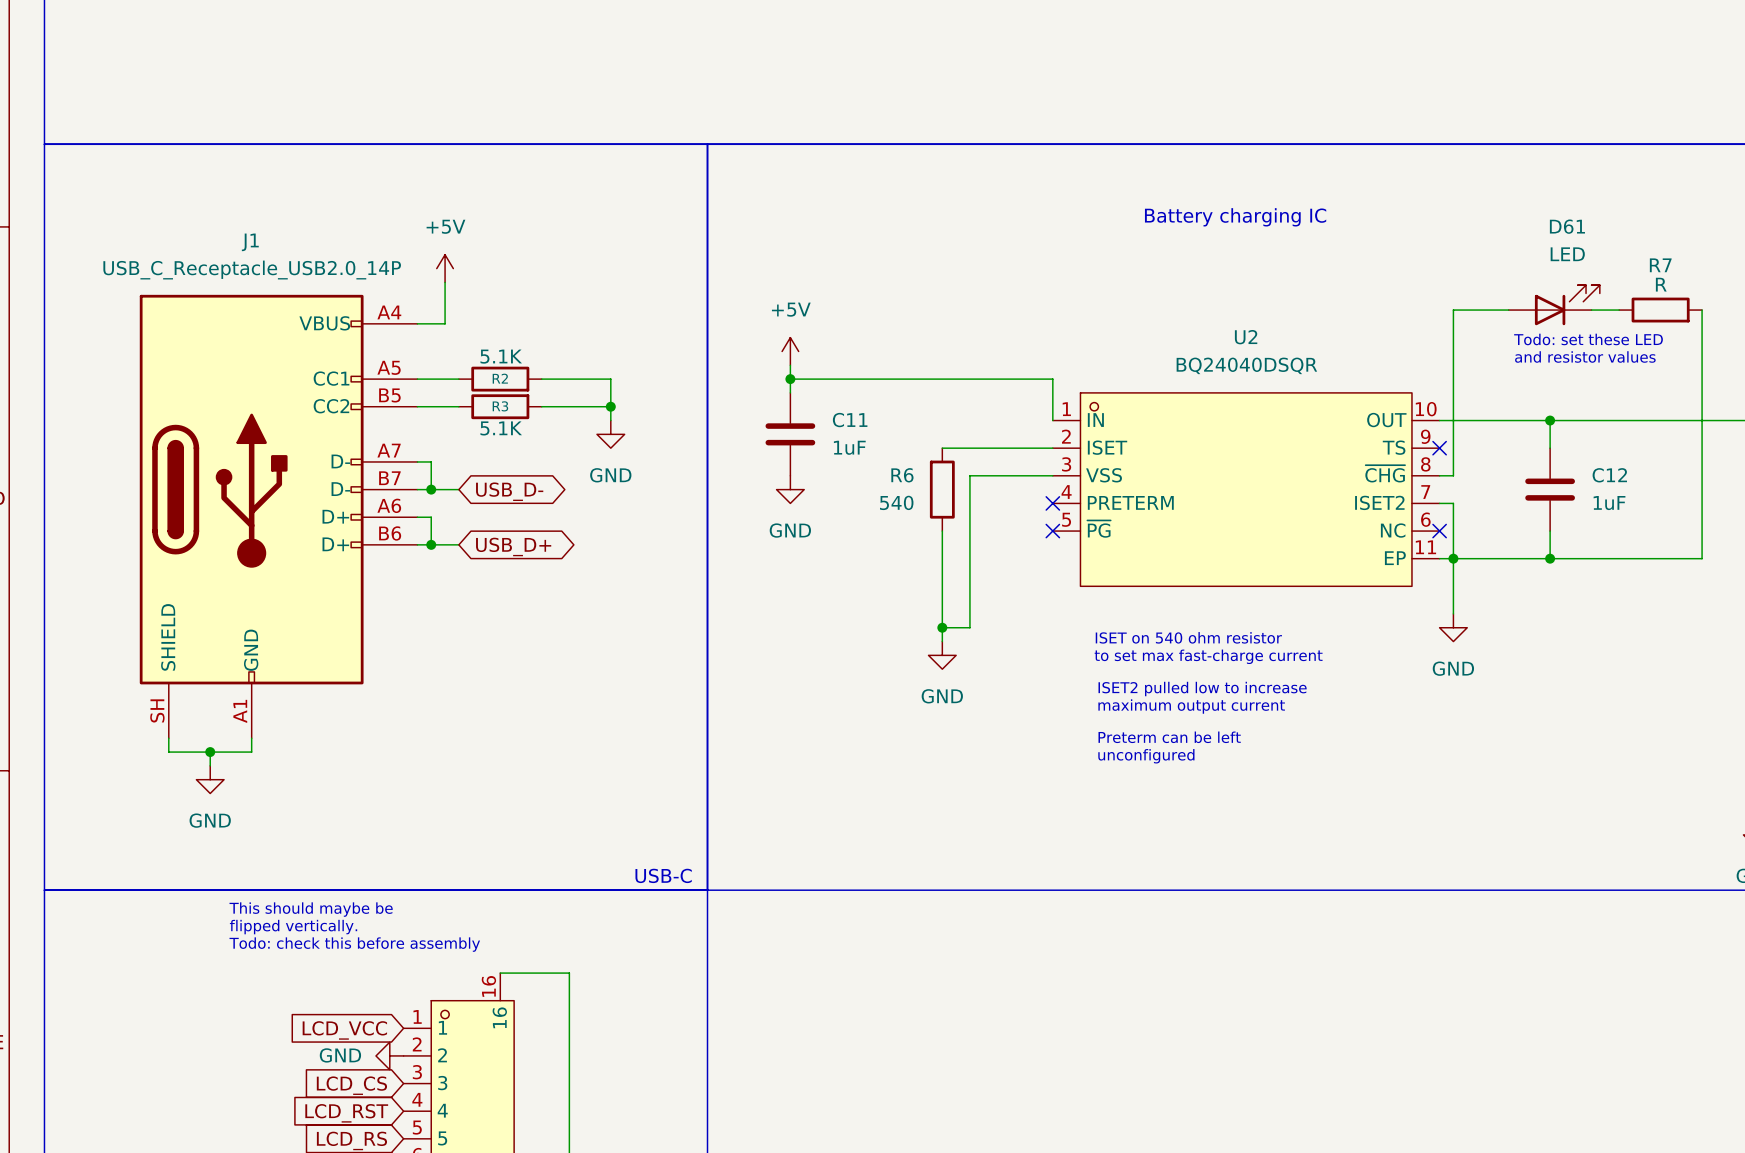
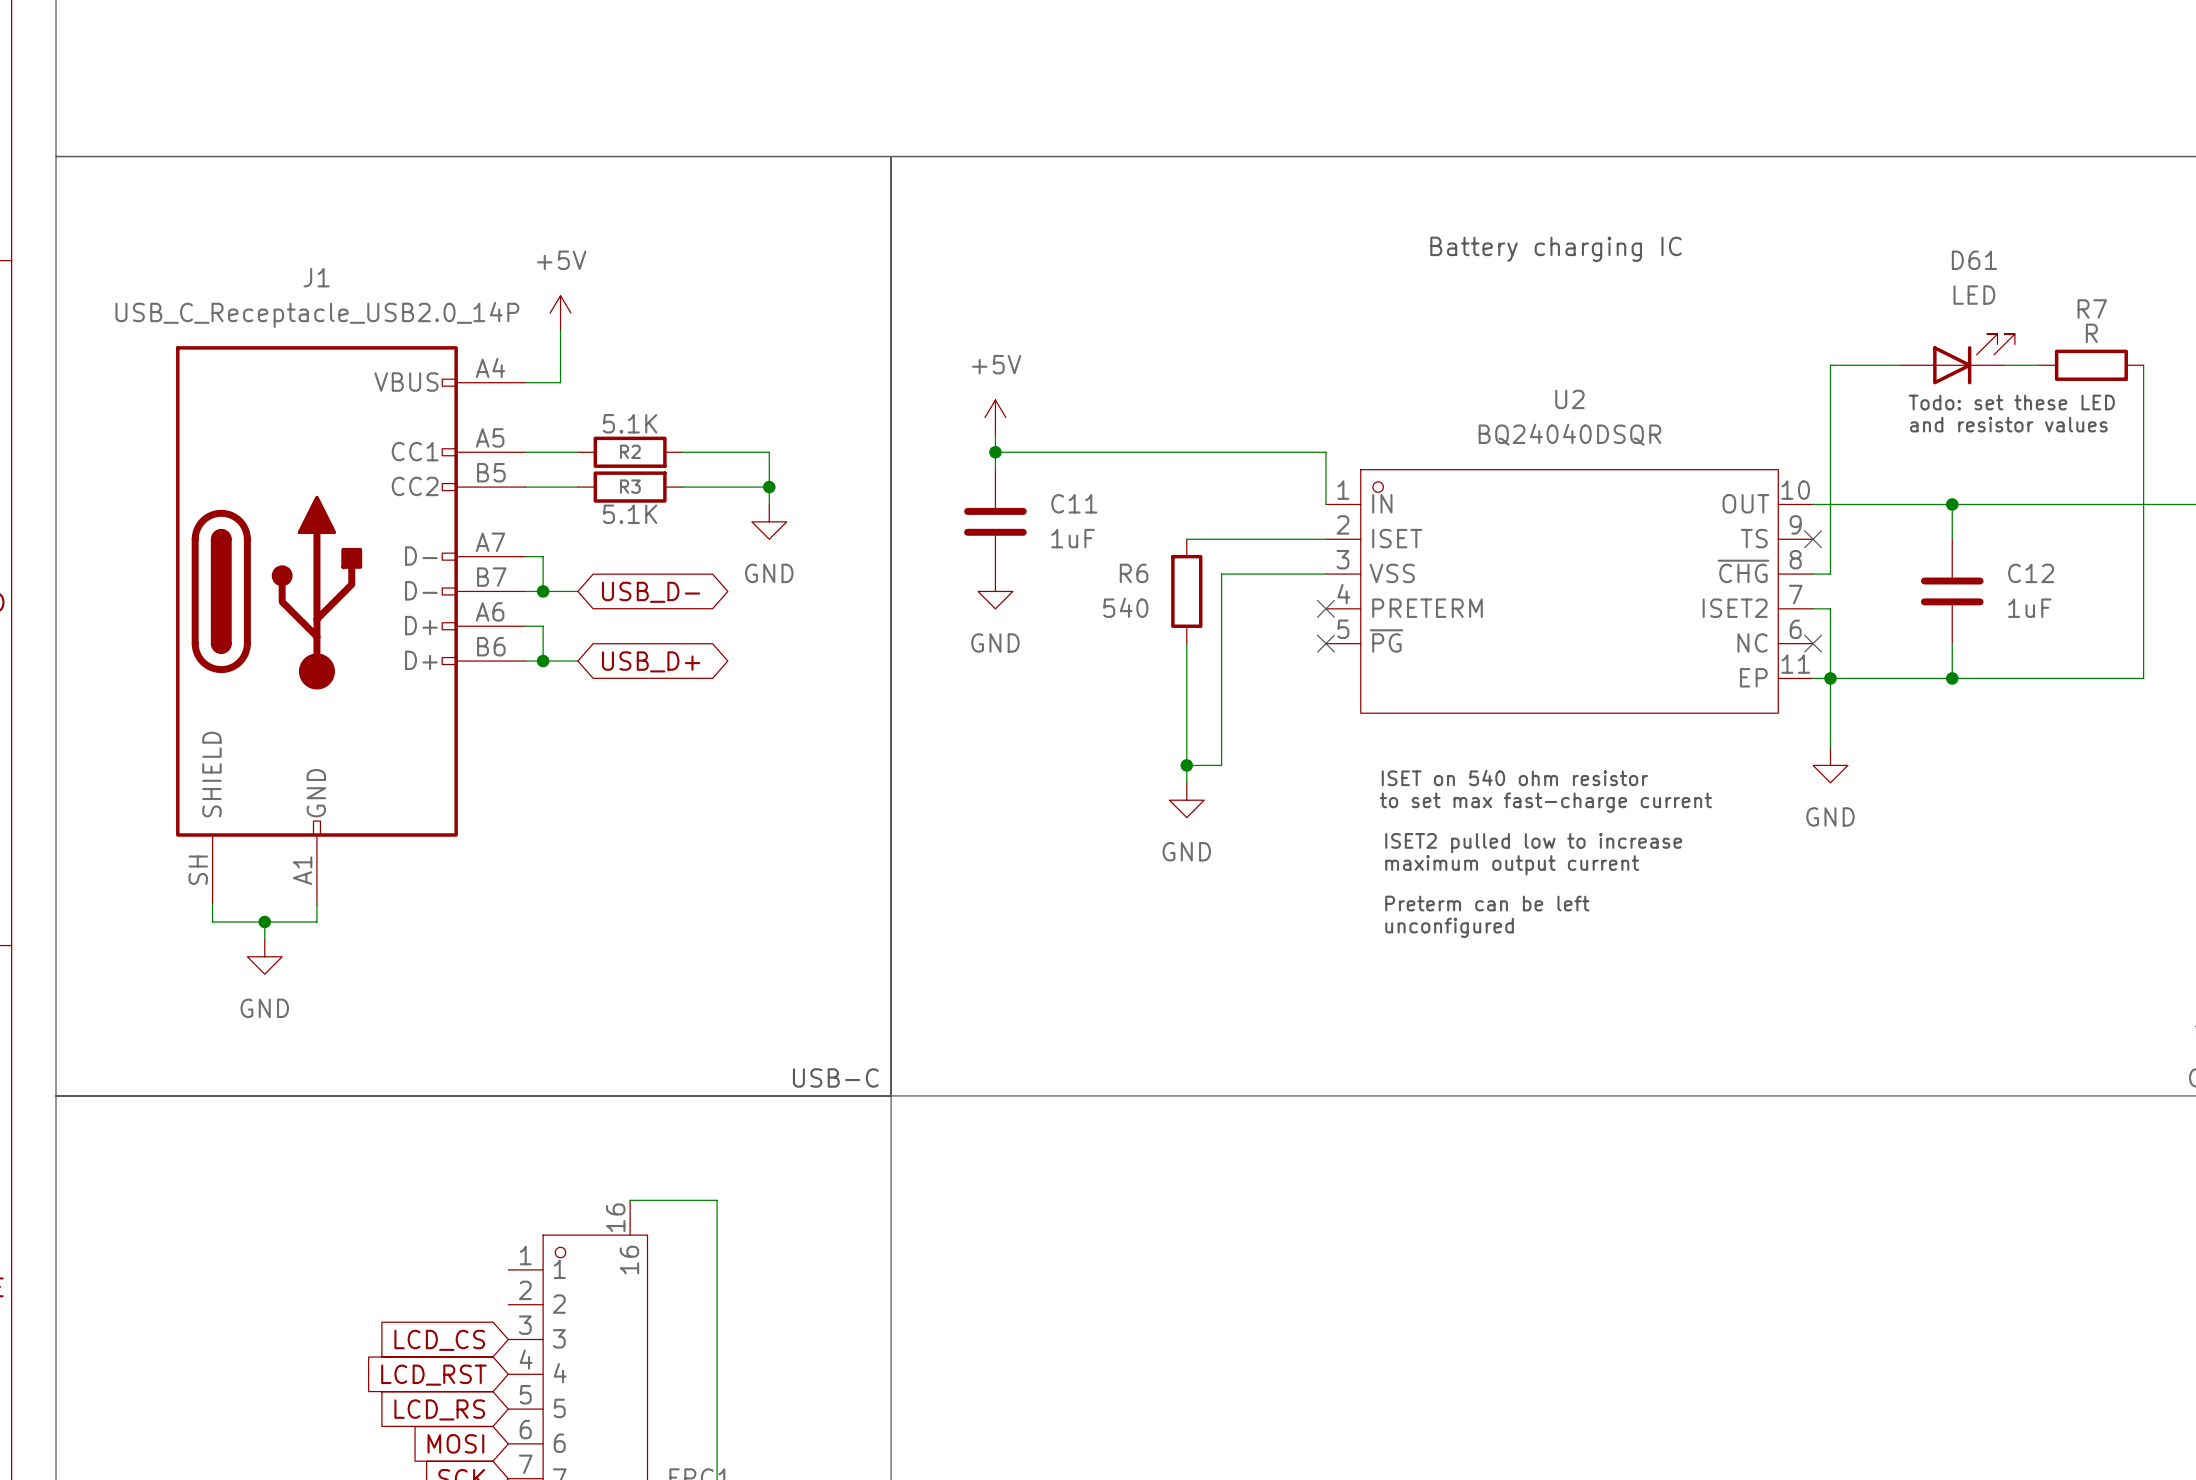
text: This should maybe be (311, 909) -> none
text: flipped vertically. (293, 927) -> none
text: Todo: check this before assembly (354, 944) -> none
global label: LCD_VCC (344, 1030) -> none
power symbol: GND (389, 1055) -> none

